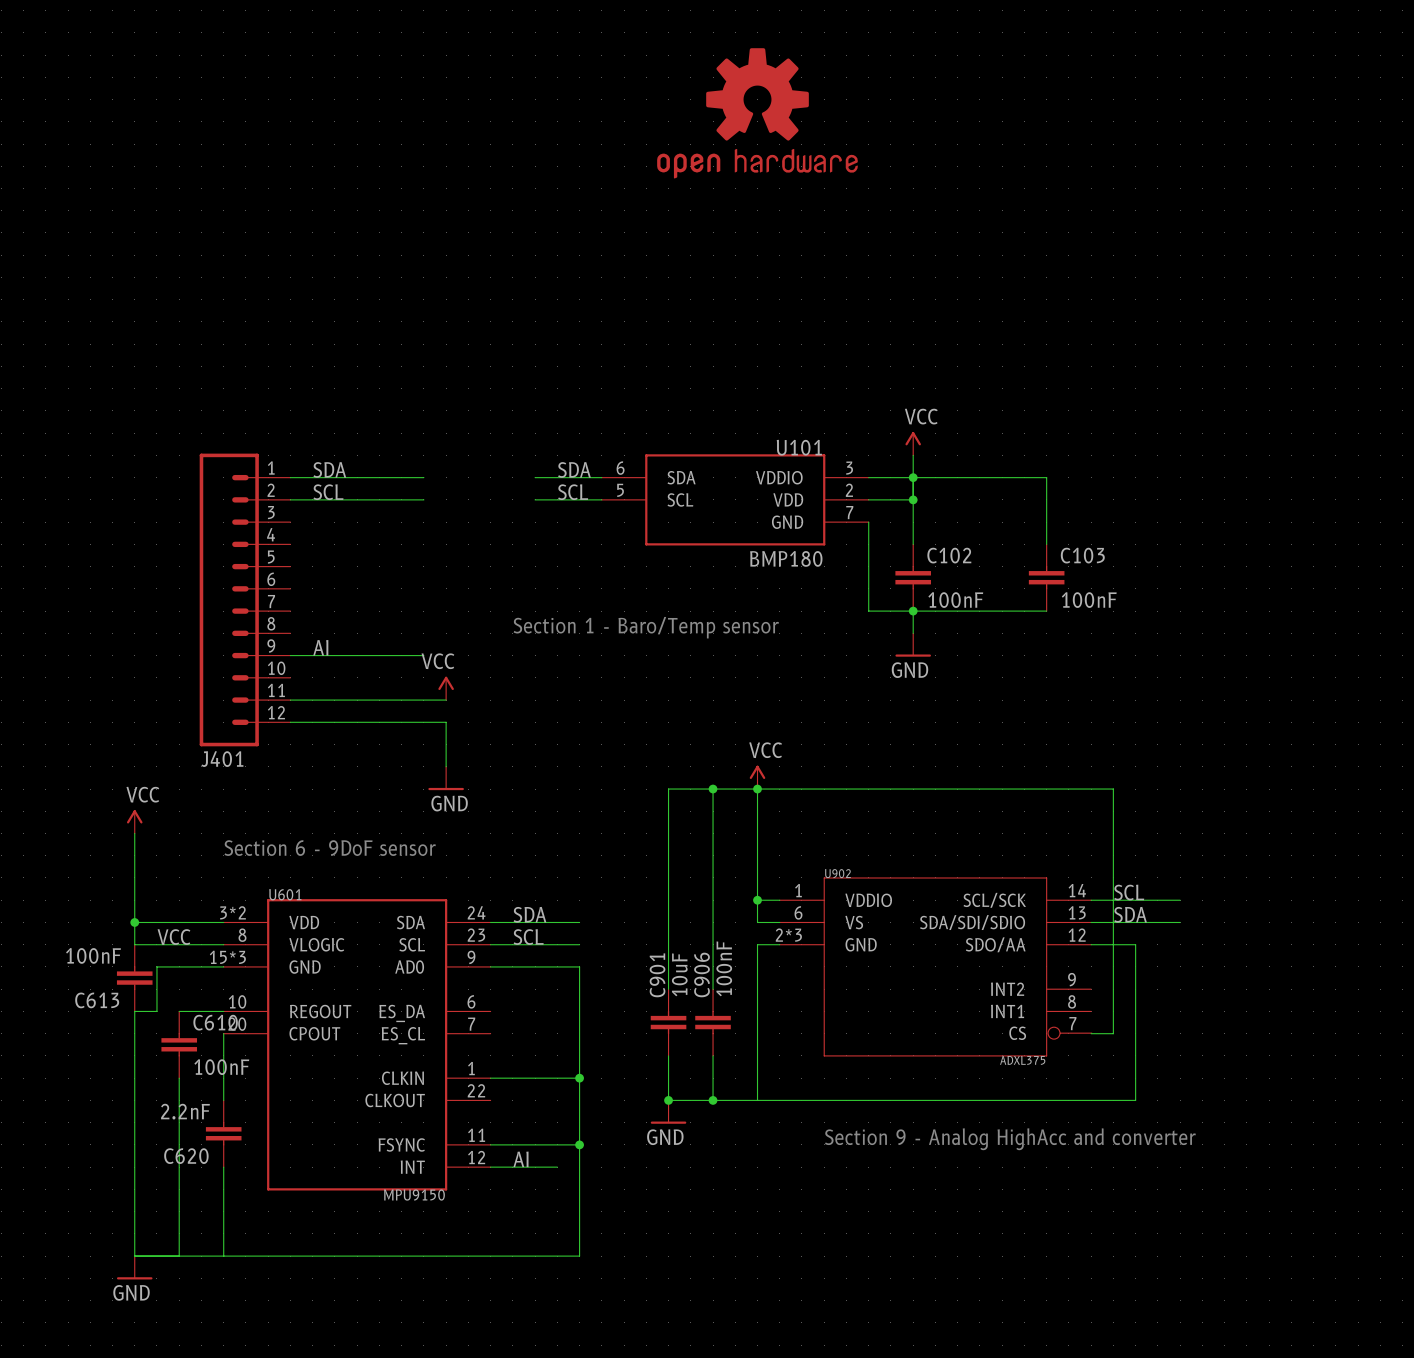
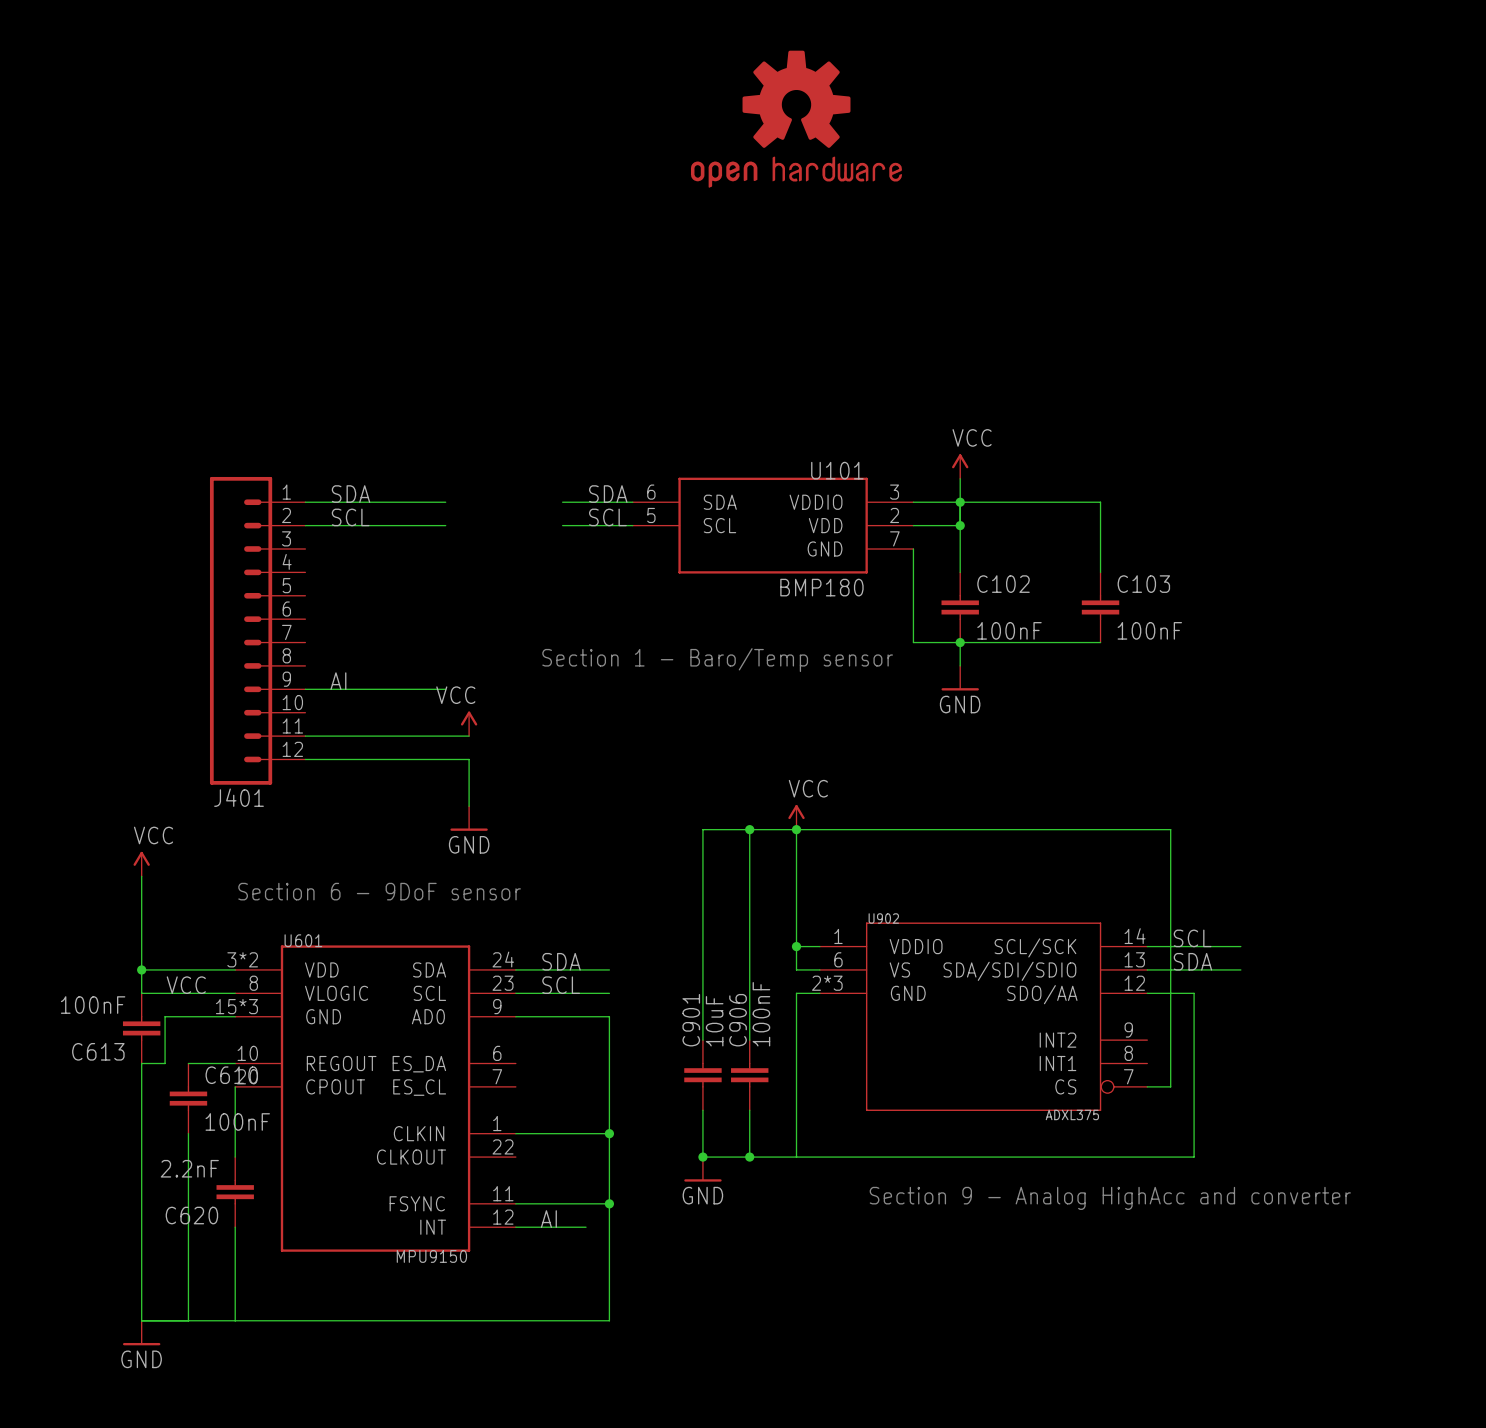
U902 symbol: [779, 877, 1092, 1057] -> [819, 922, 1148, 1111]

